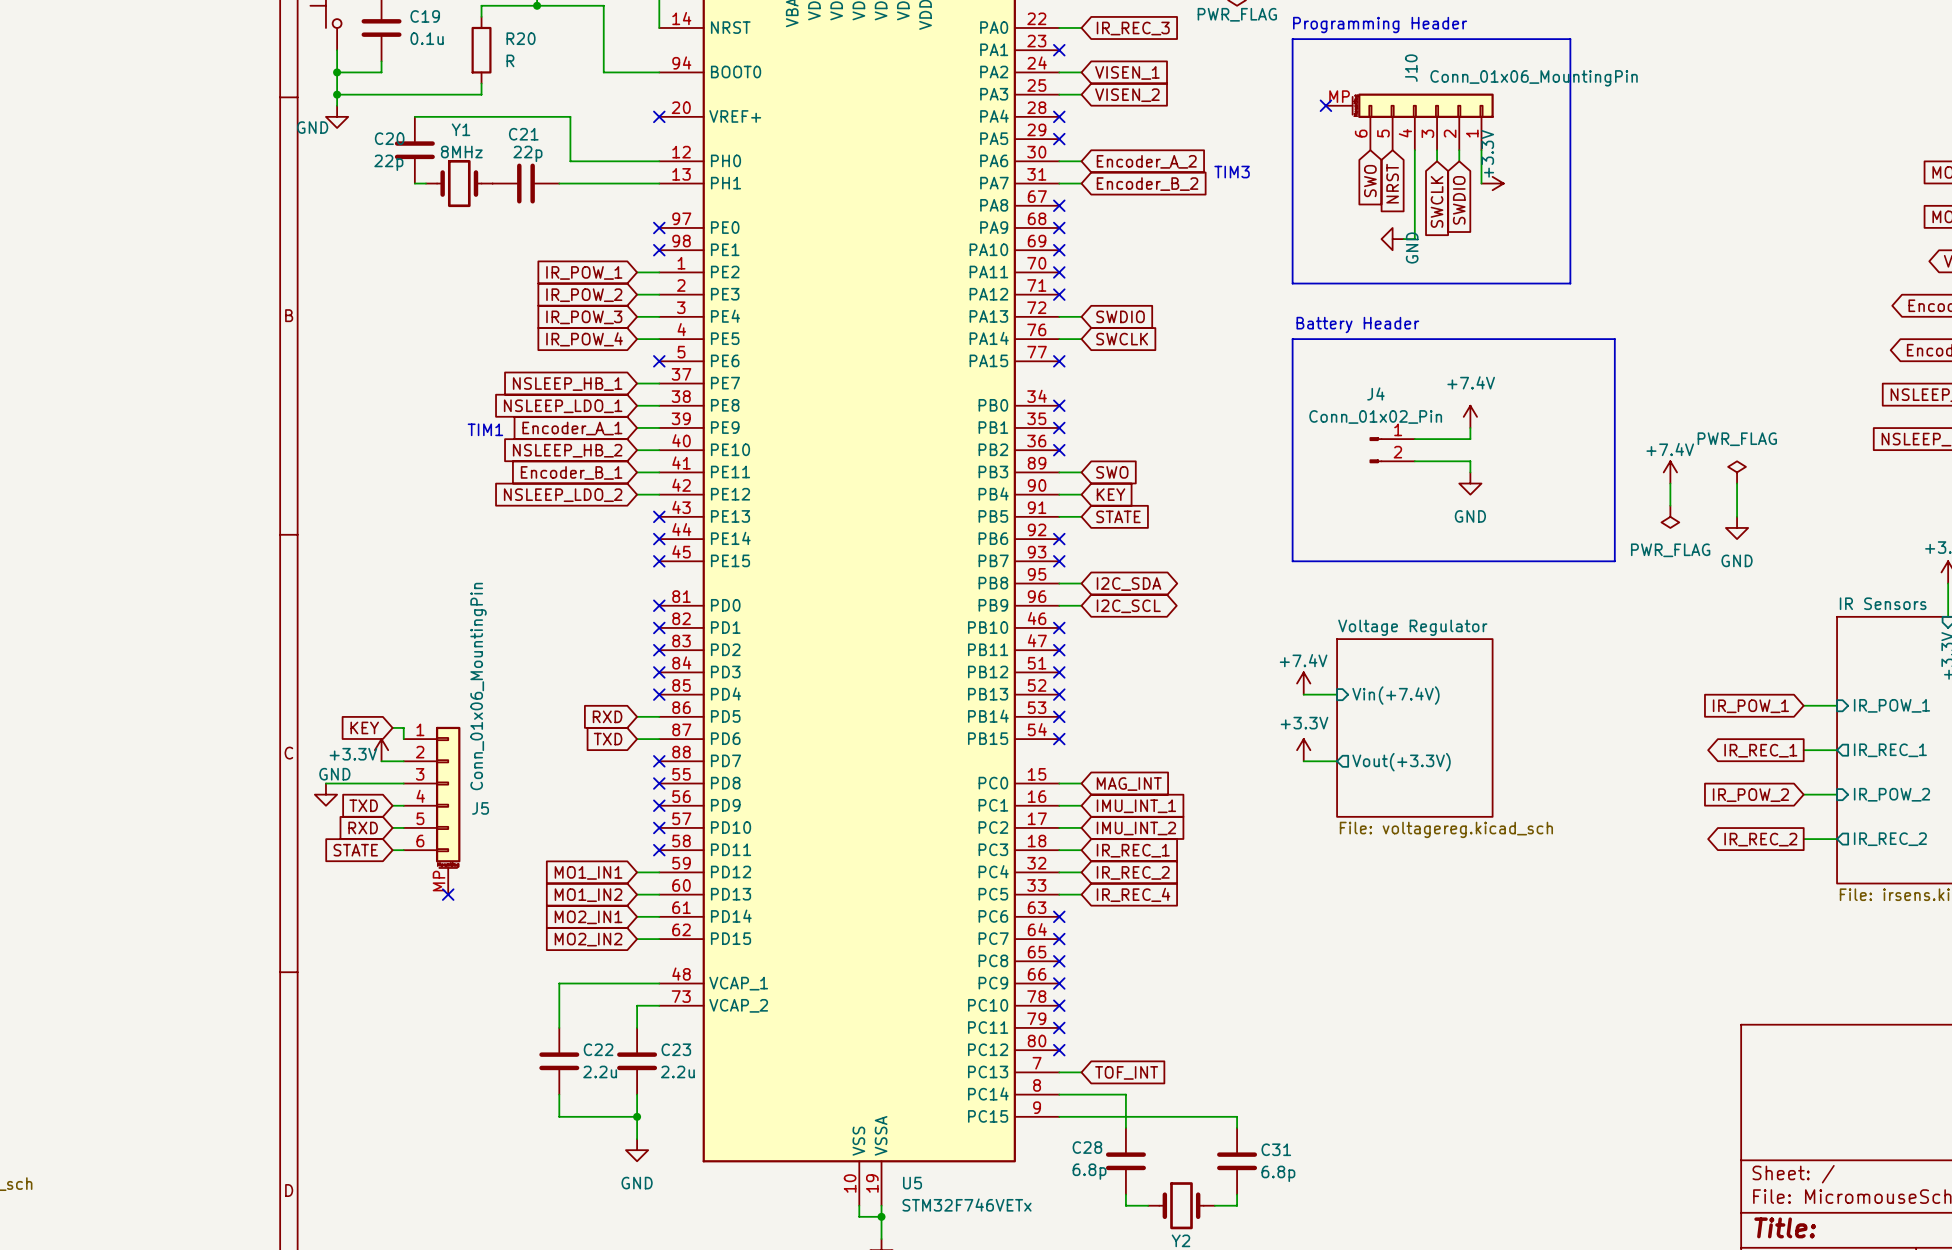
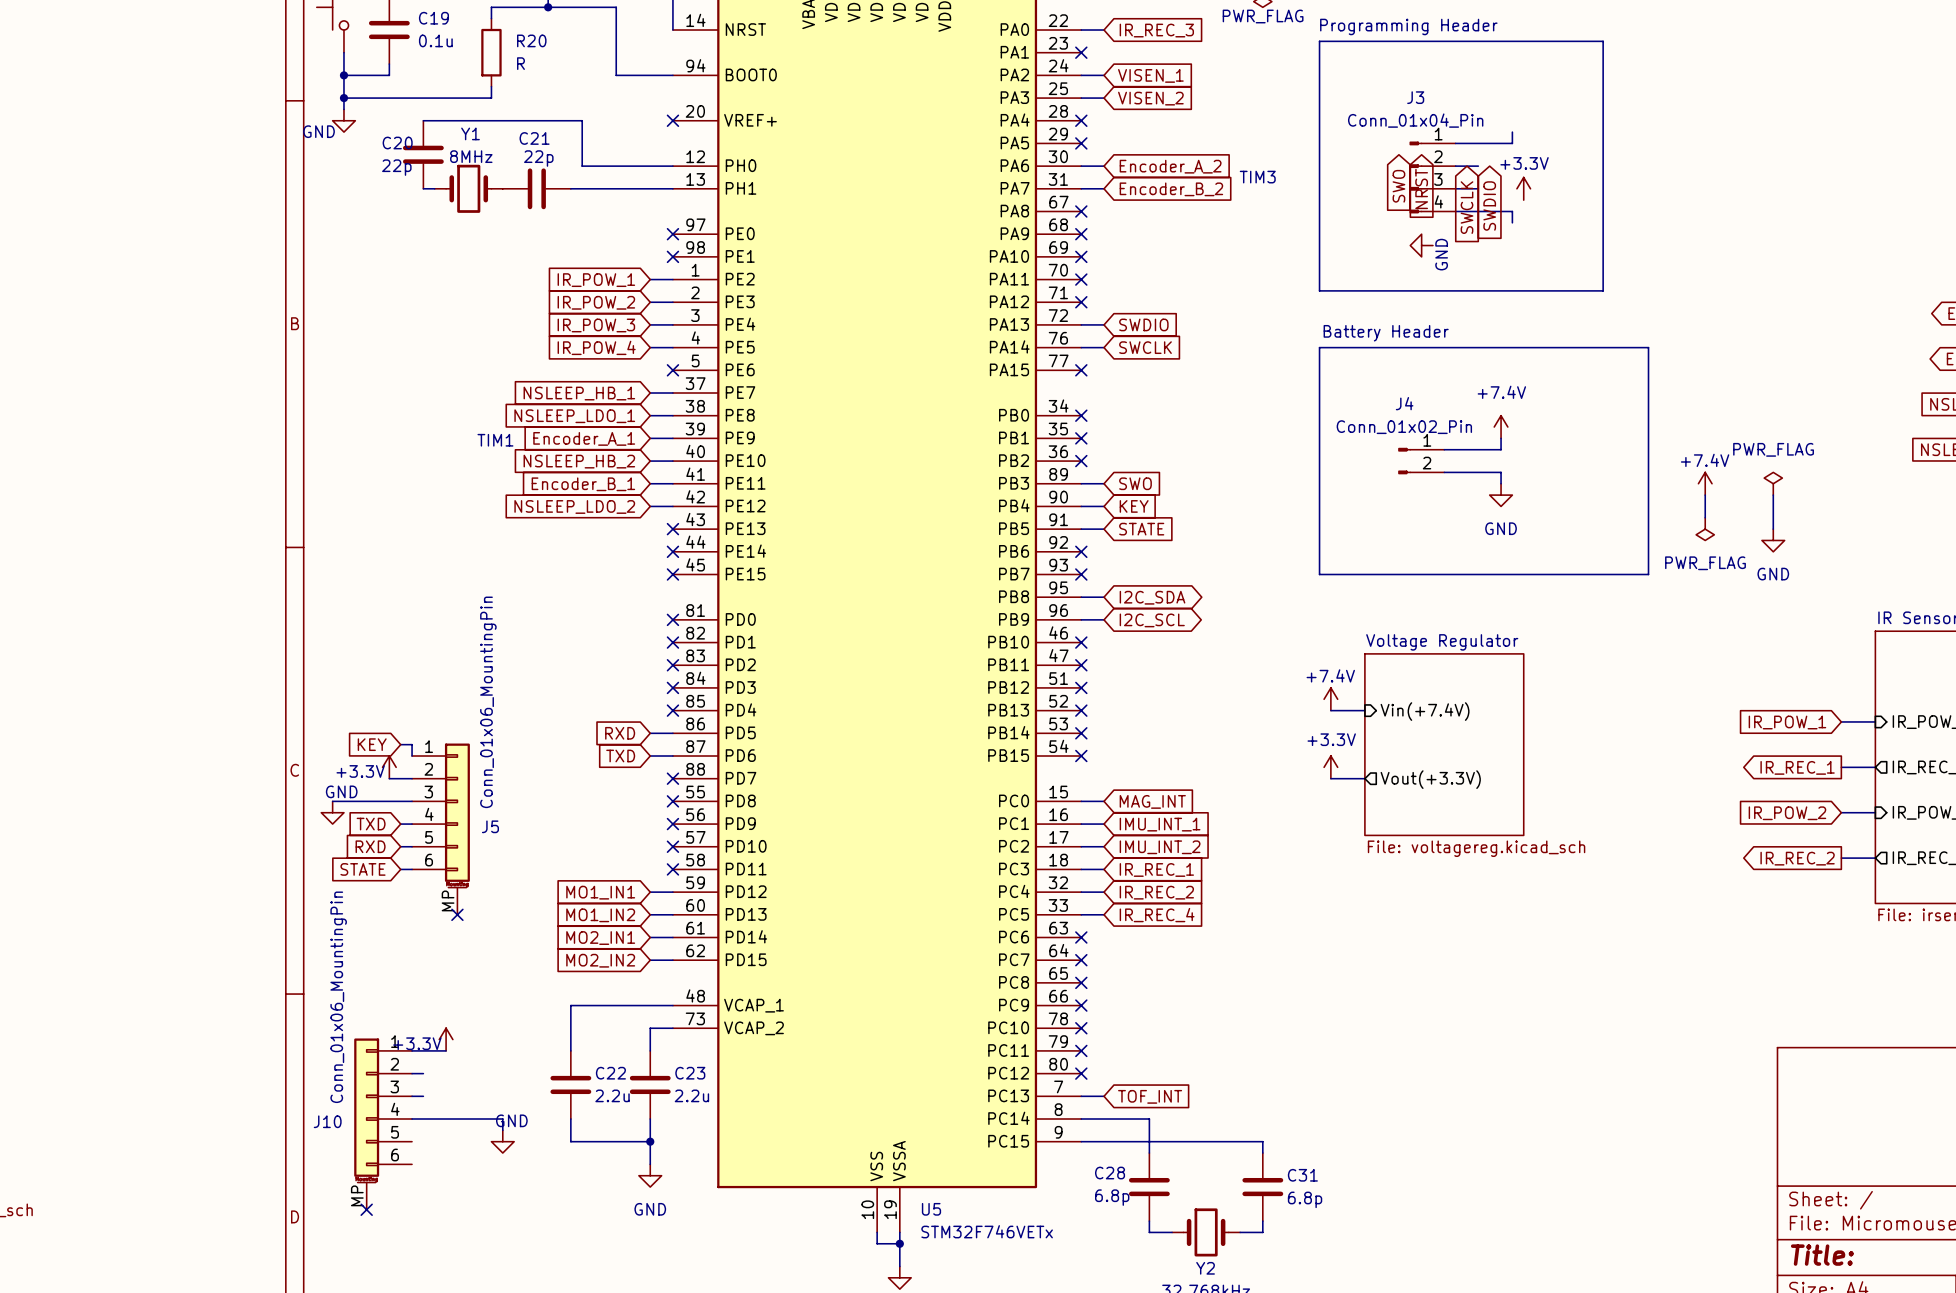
no-connect mark: (1325, 105) -> none
J10 rotation: 0° (1422, 105) -> 90° counterclockwise (366, 1110)
J10 position: (1409, 121) -> (383, 1124)
wire: none -> (1512, 132) (1512, 143) (1455, 143)
wire: (1414, 150) (1414, 239) (1403, 239) -> none
wire: (1437, 150) (1437, 161) -> none
wire: (1459, 150) (1459, 161) -> none
wire: (1481, 150) (1481, 183) -> none
wire: none -> (1455, 166) (1478, 166)
J3: none -> Conn_01x04_Pin (1432, 177)
wire: none -> (1455, 188) (1478, 188)
power symbol rotation: 0° (1492, 183) -> 90° counterclockwise (1523, 188)
wire: none -> (1455, 211) (1512, 211) (1512, 222)
power symbol: none -> +3.3V (446, 1039)
wire: none -> (412, 1050) (446, 1050)
wire: none -> (412, 1073) (423, 1073)
wire: none -> (412, 1096) (423, 1096)
wire: none -> (412, 1119) (502, 1119) (502, 1130)
power symbol: none -> GND (502, 1141)
no-connect mark: none -> (366, 1209)

